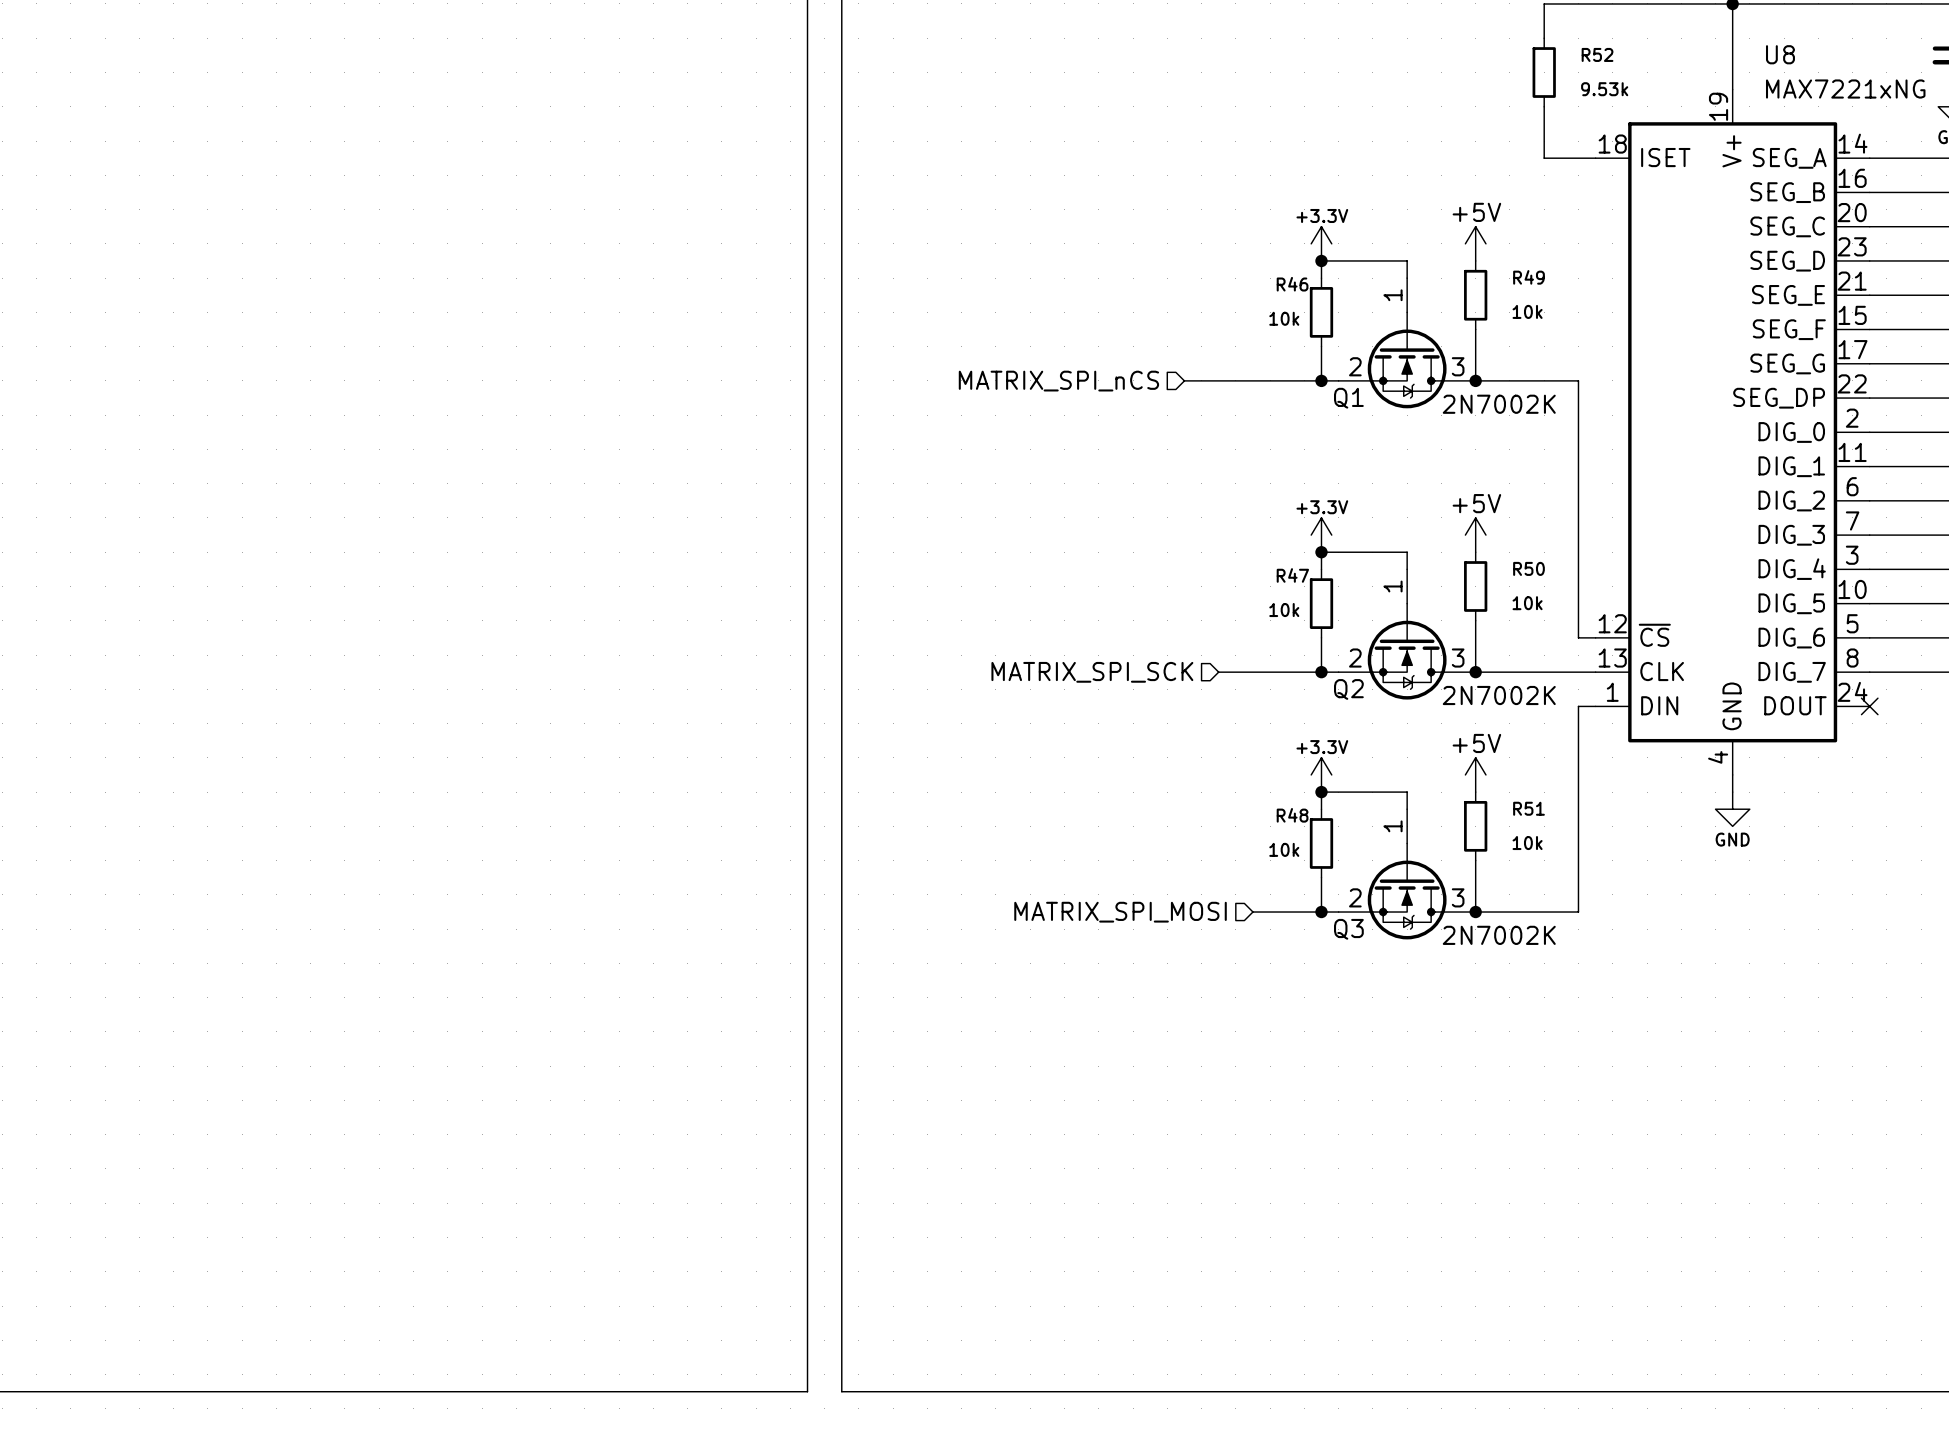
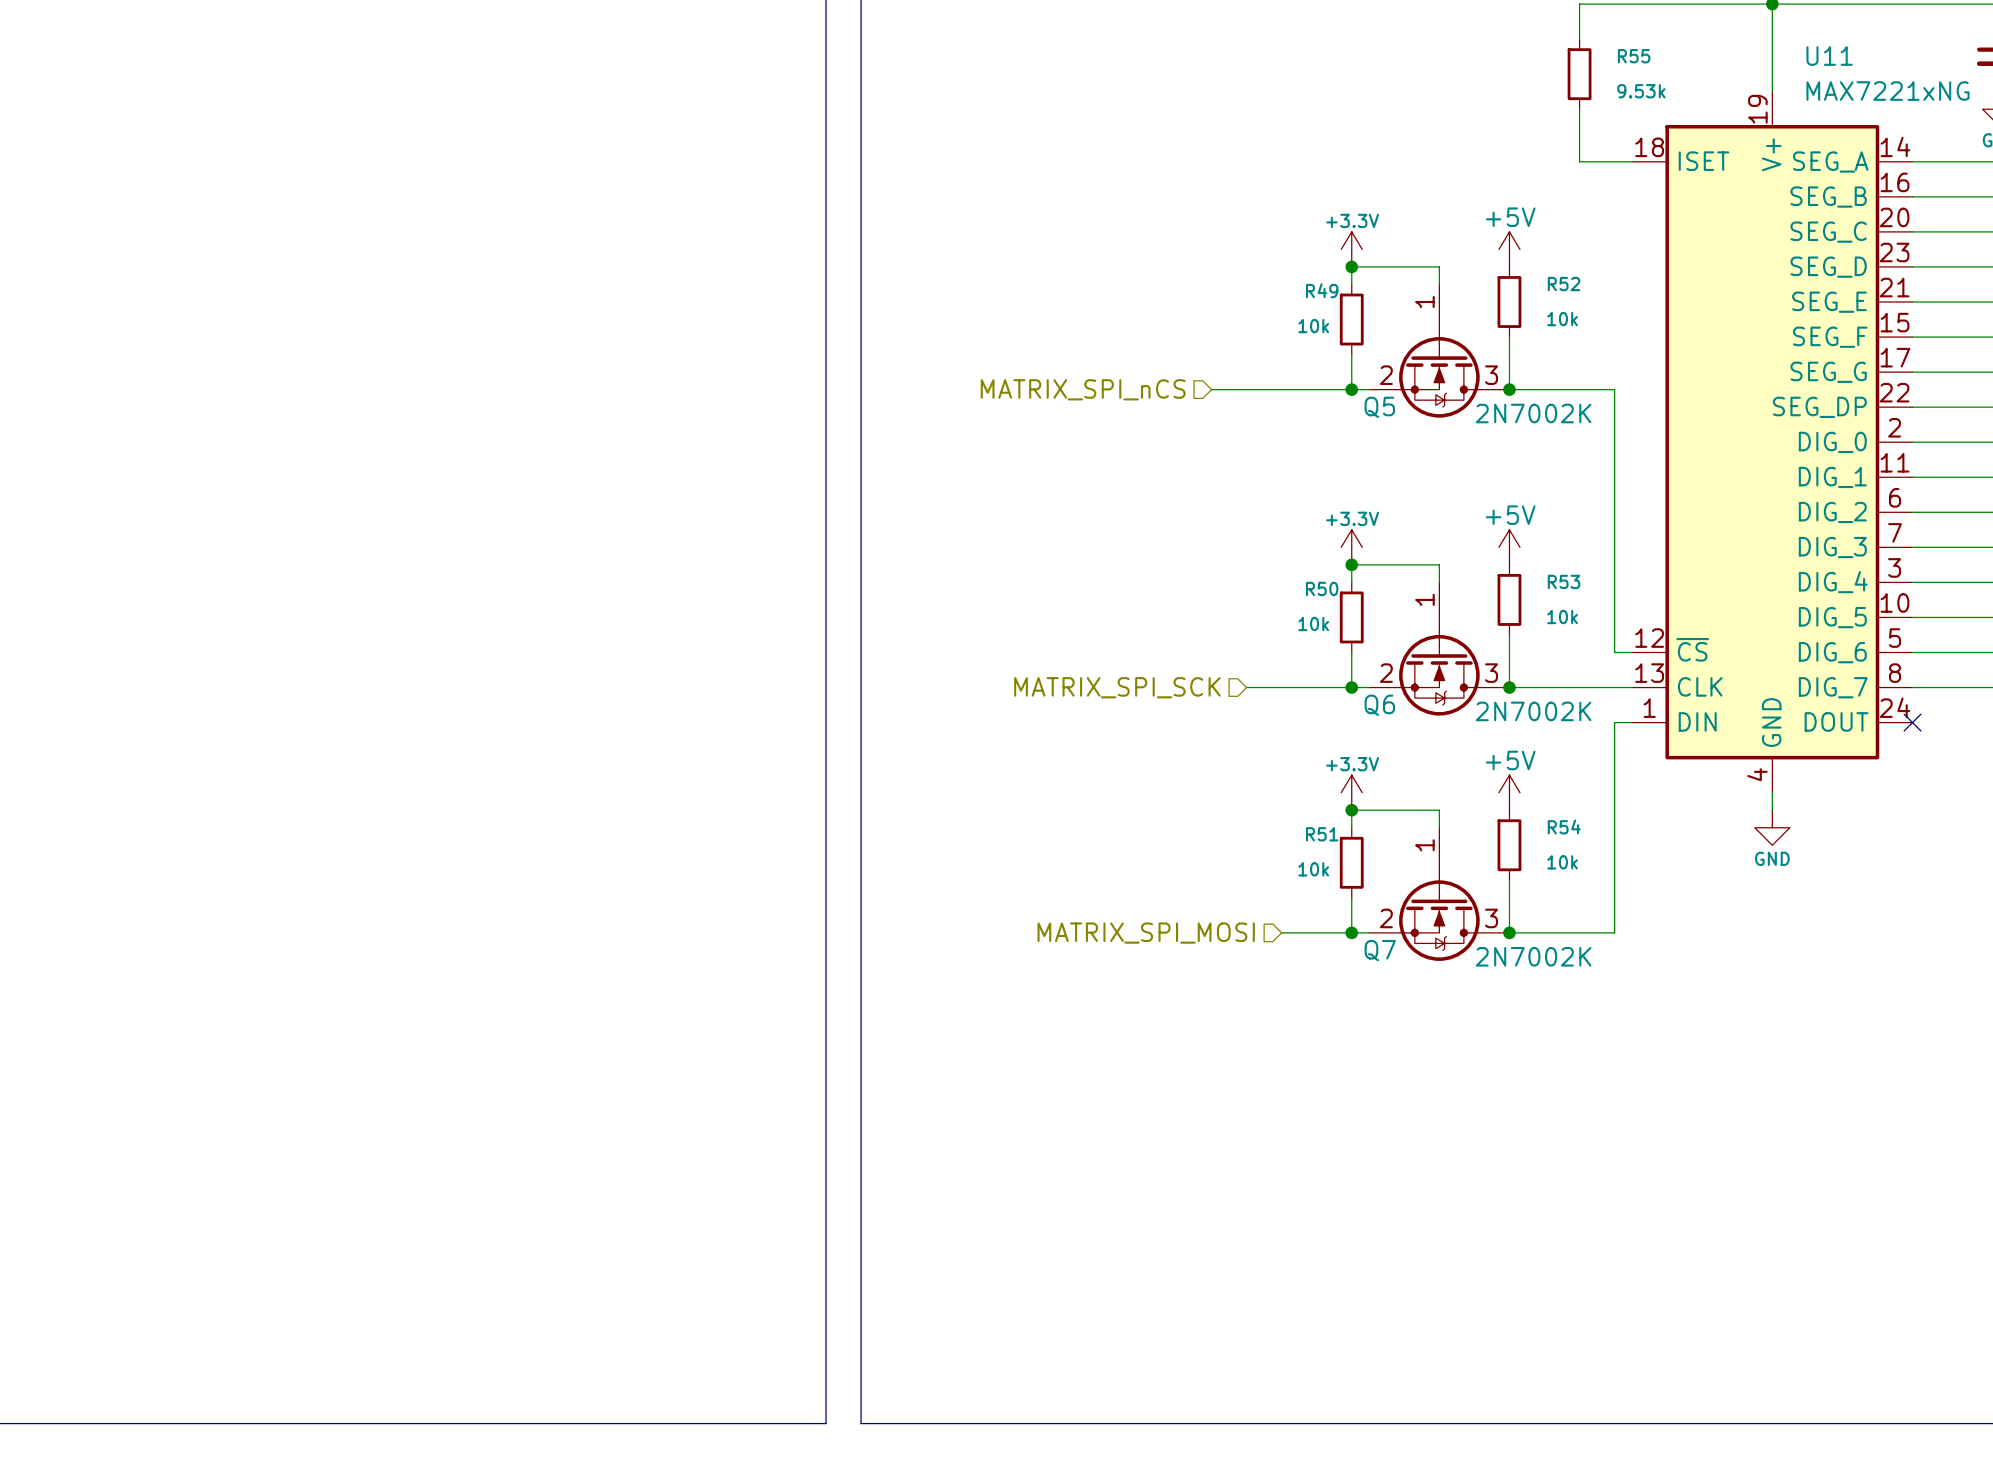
R52 name: R52 (1597, 54) -> R55 (1634, 56)
U8 name: U8 (1780, 54) -> U11 (1829, 56)
R49 name: R49 (1528, 277) -> R52 (1564, 284)
R46 name: R46 (1292, 284) -> R49 (1322, 290)
Q1 name: Q1 (1348, 398) -> Q5 (1379, 407)
R50 name: R50 (1528, 568) -> R53 (1564, 581)
R47 name: R47 (1292, 575) -> R50 (1322, 588)
Q2 name: Q2 (1348, 689) -> Q6 (1379, 705)
R51 name: R51 (1528, 808) -> R54 (1564, 826)
R48 name: R48 (1292, 815) -> R51 (1322, 834)
Q3 name: Q3 (1348, 929) -> Q7 (1380, 950)

